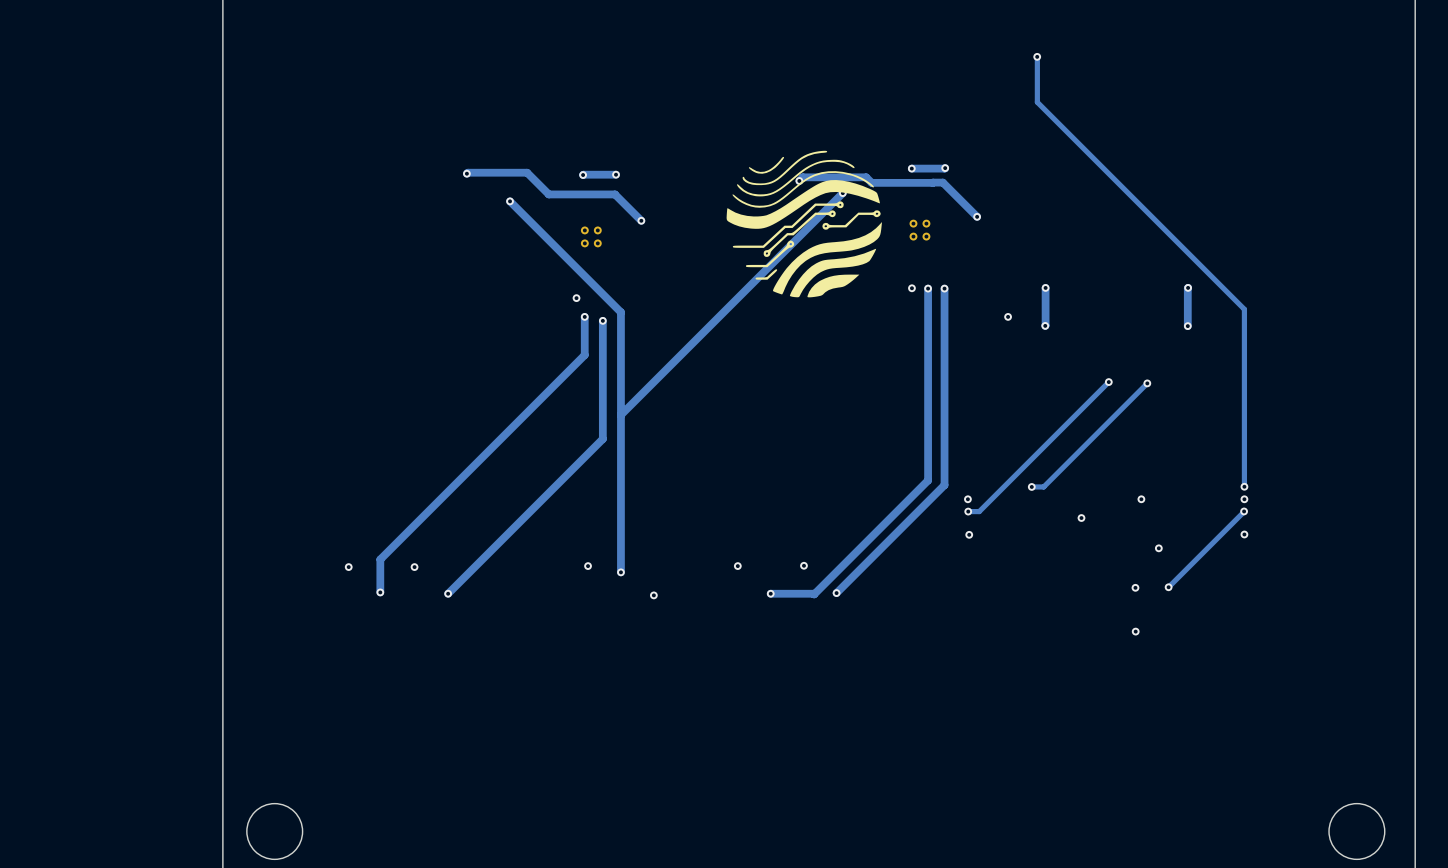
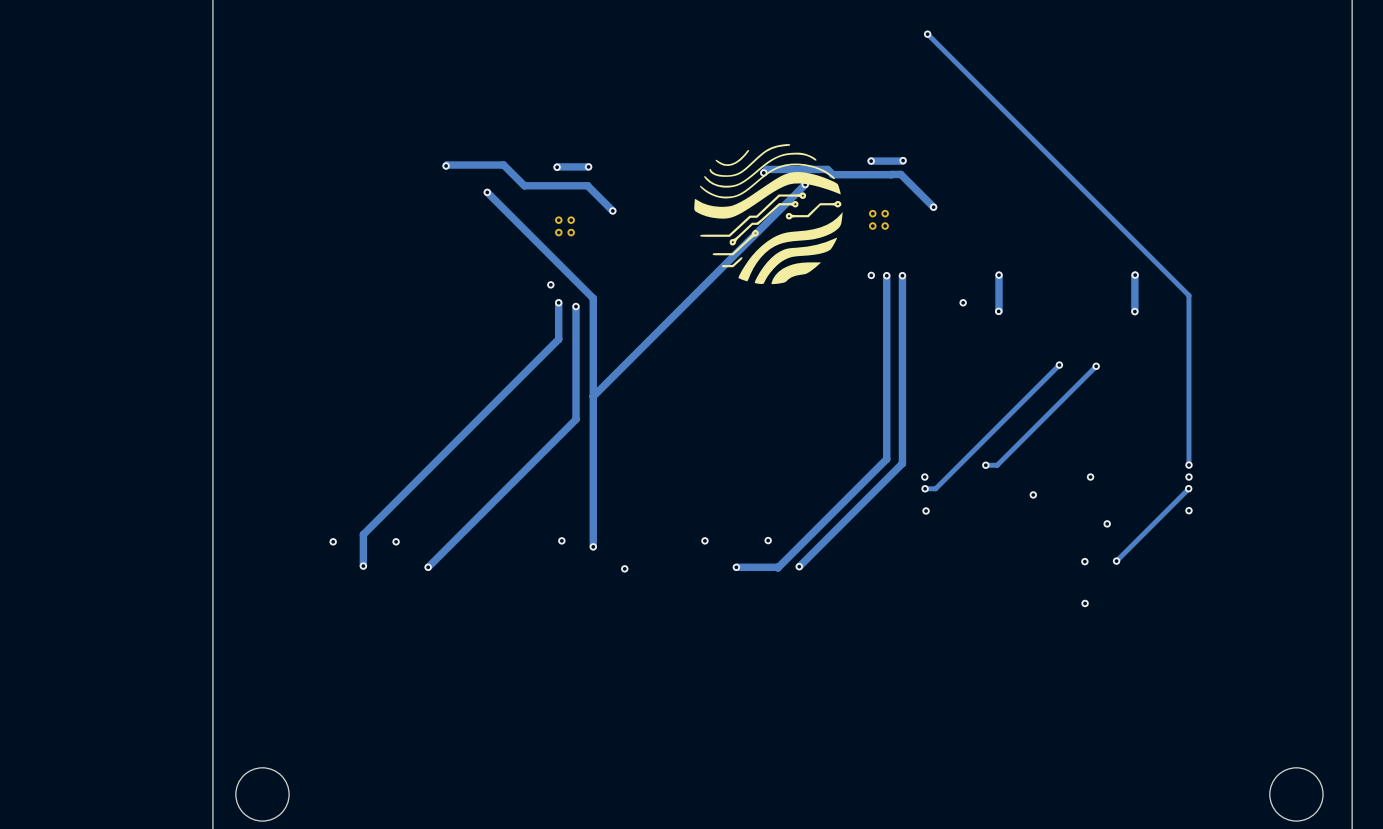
via position: (1037, 56) -> (927, 34)
track: (1037, 57) (1037, 102) -> (927, 34) (991, 97)

